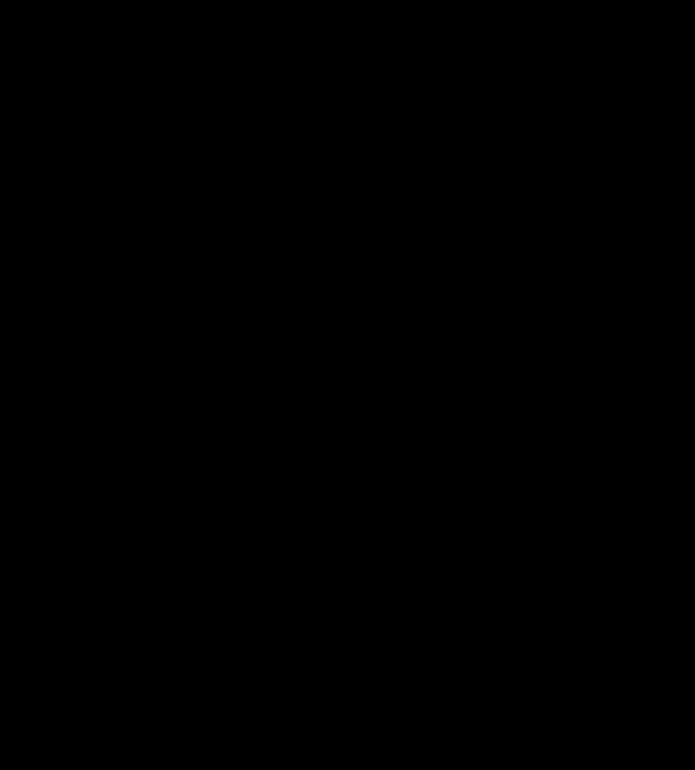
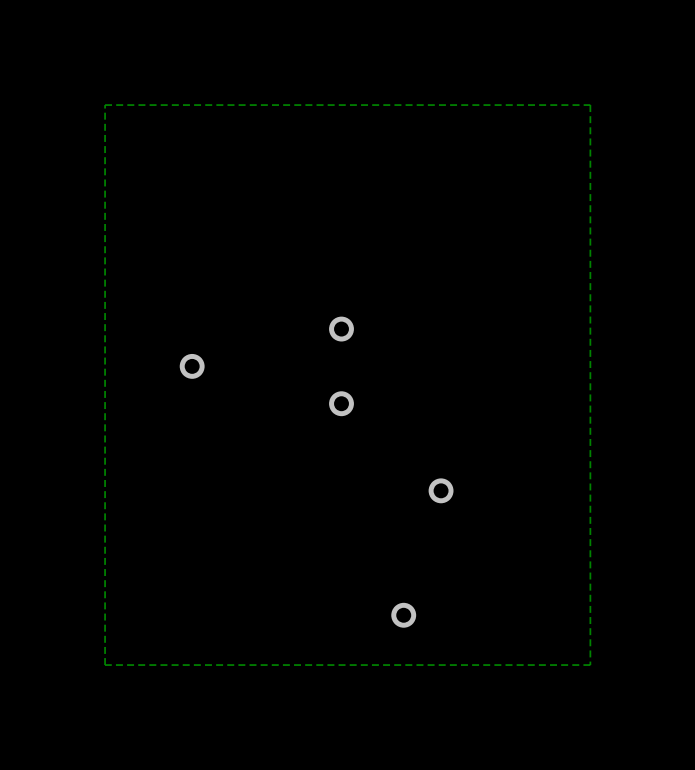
zone outline: none -> (590, 105) (105, 105) (105, 665) (590, 665) (590, 105)
via: none -> (341, 329)
via: none -> (192, 366)
via: none -> (341, 403)
via: none -> (441, 490)
via: none -> (403, 615)

